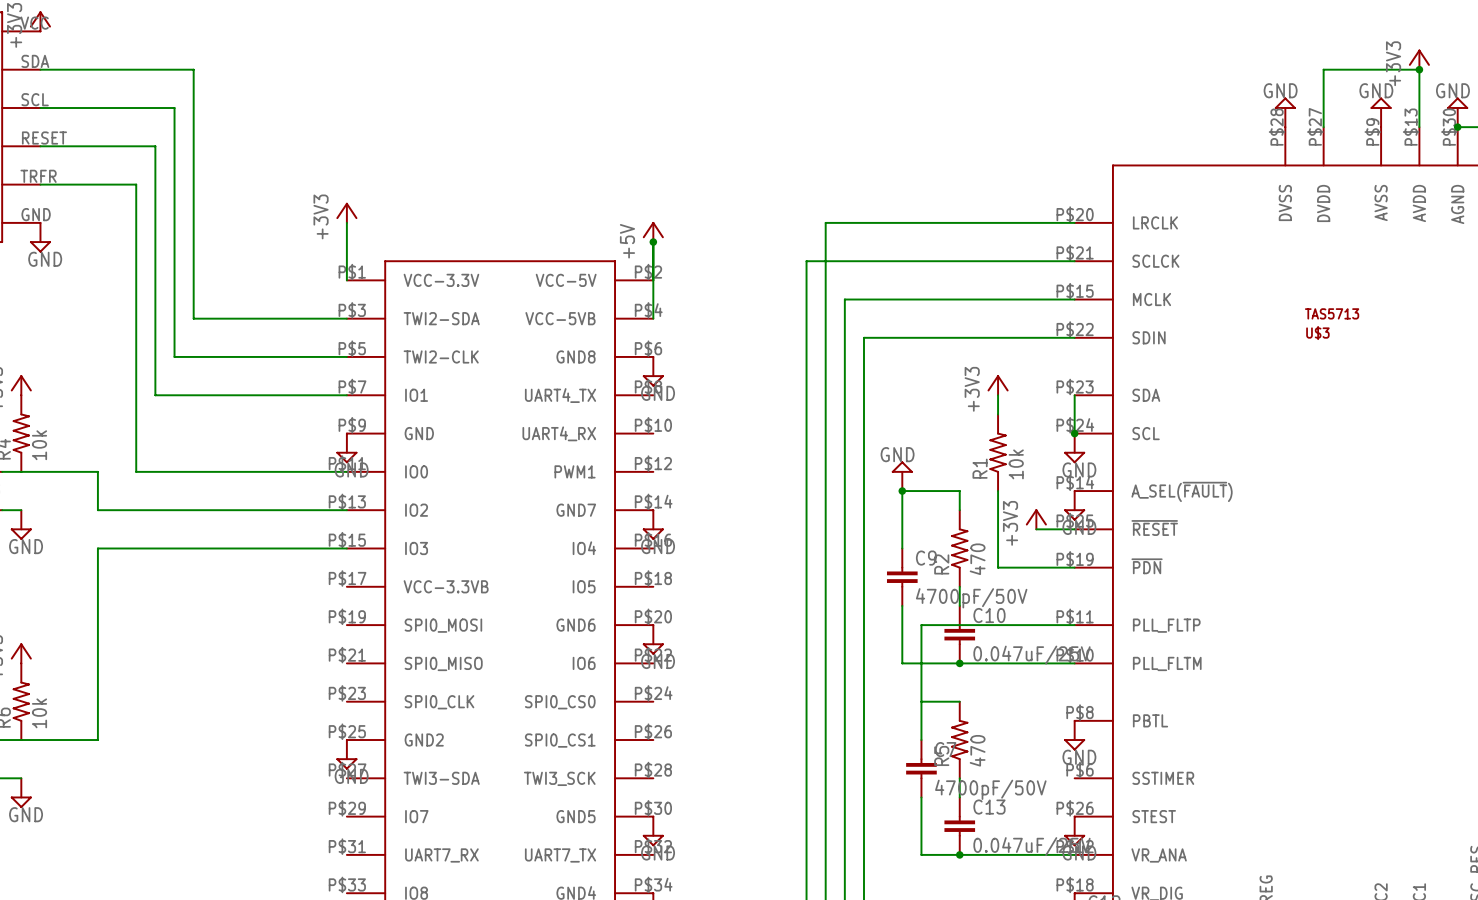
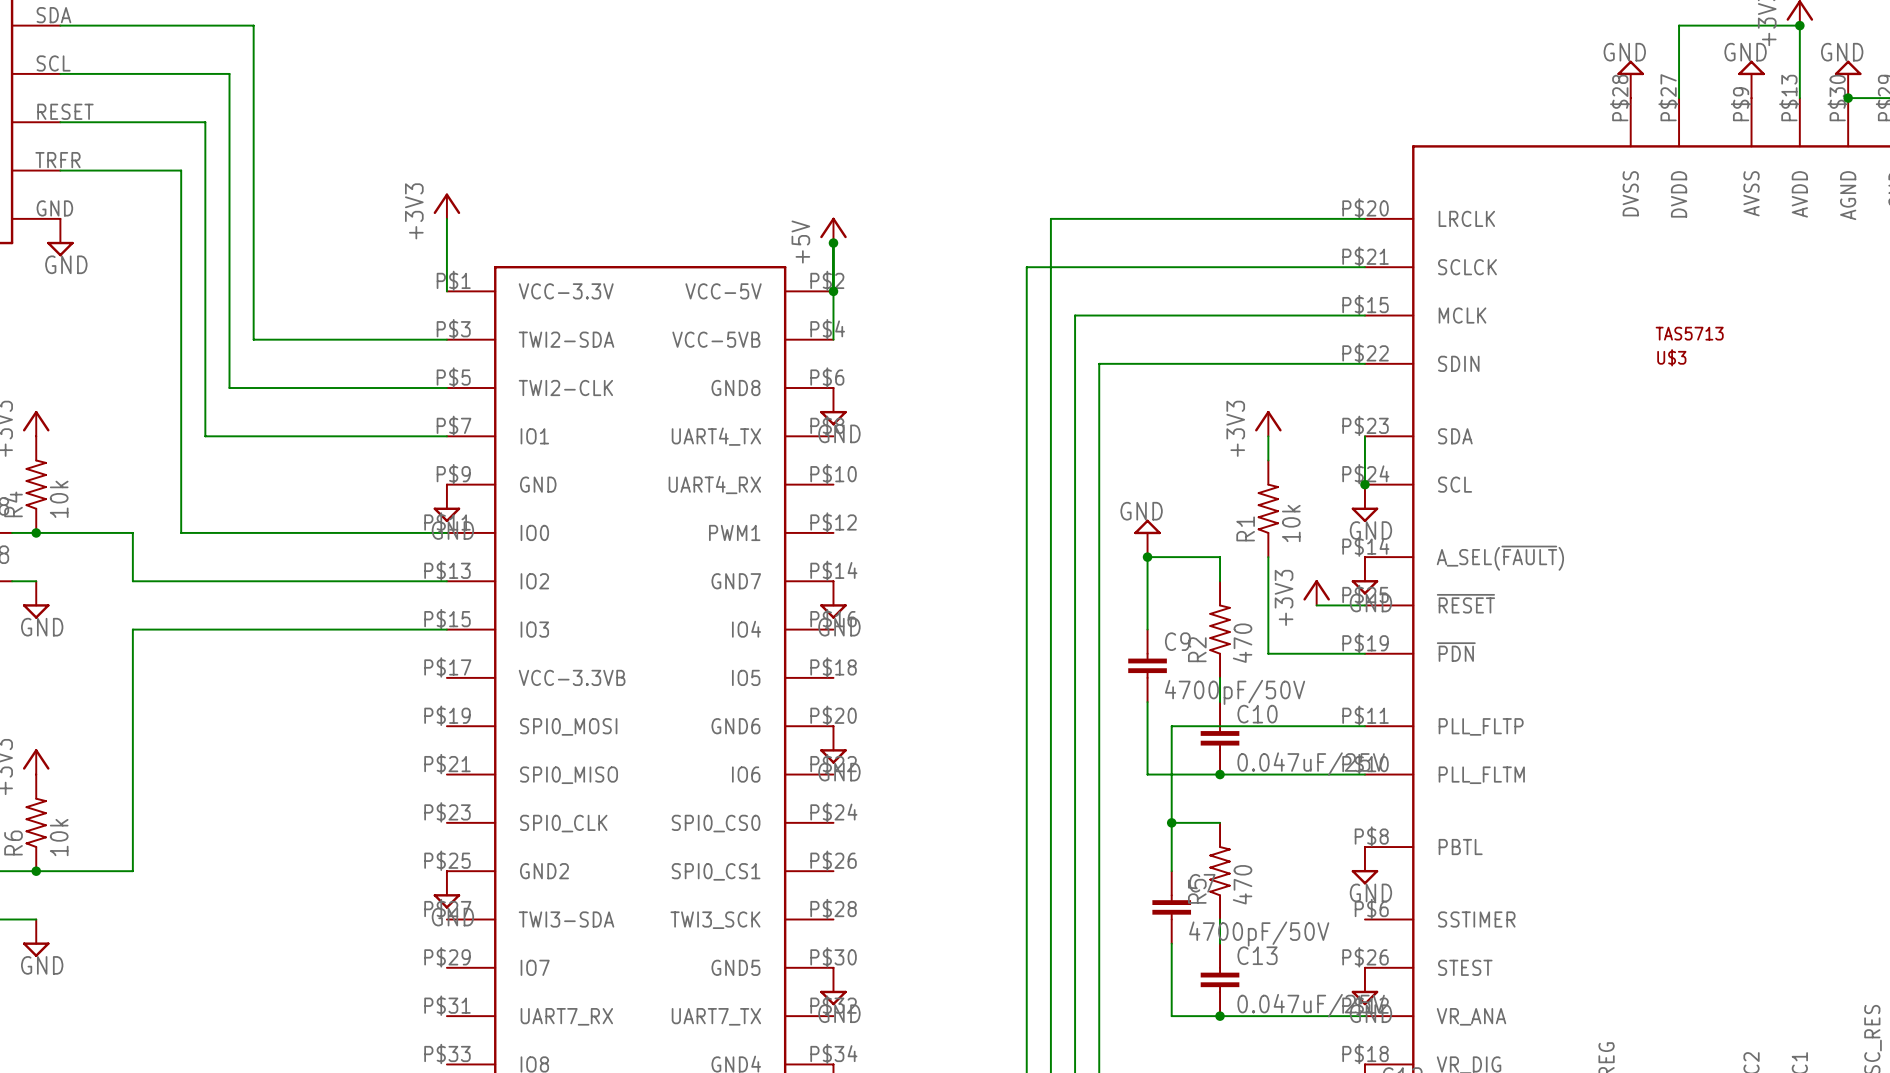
junction: none -> (833, 291)
junction: none -> (36, 532)
junction: none -> (1171, 822)
junction: none -> (36, 871)

